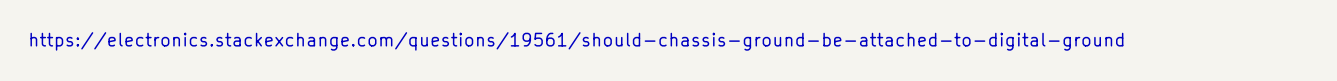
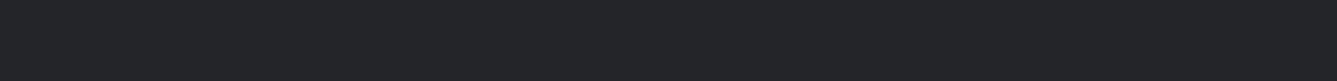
text: https://electronics.stackexchange.com/questions/19561/should-chassis-ground-be-attached-to-digital-ground (576, 41) -> none

